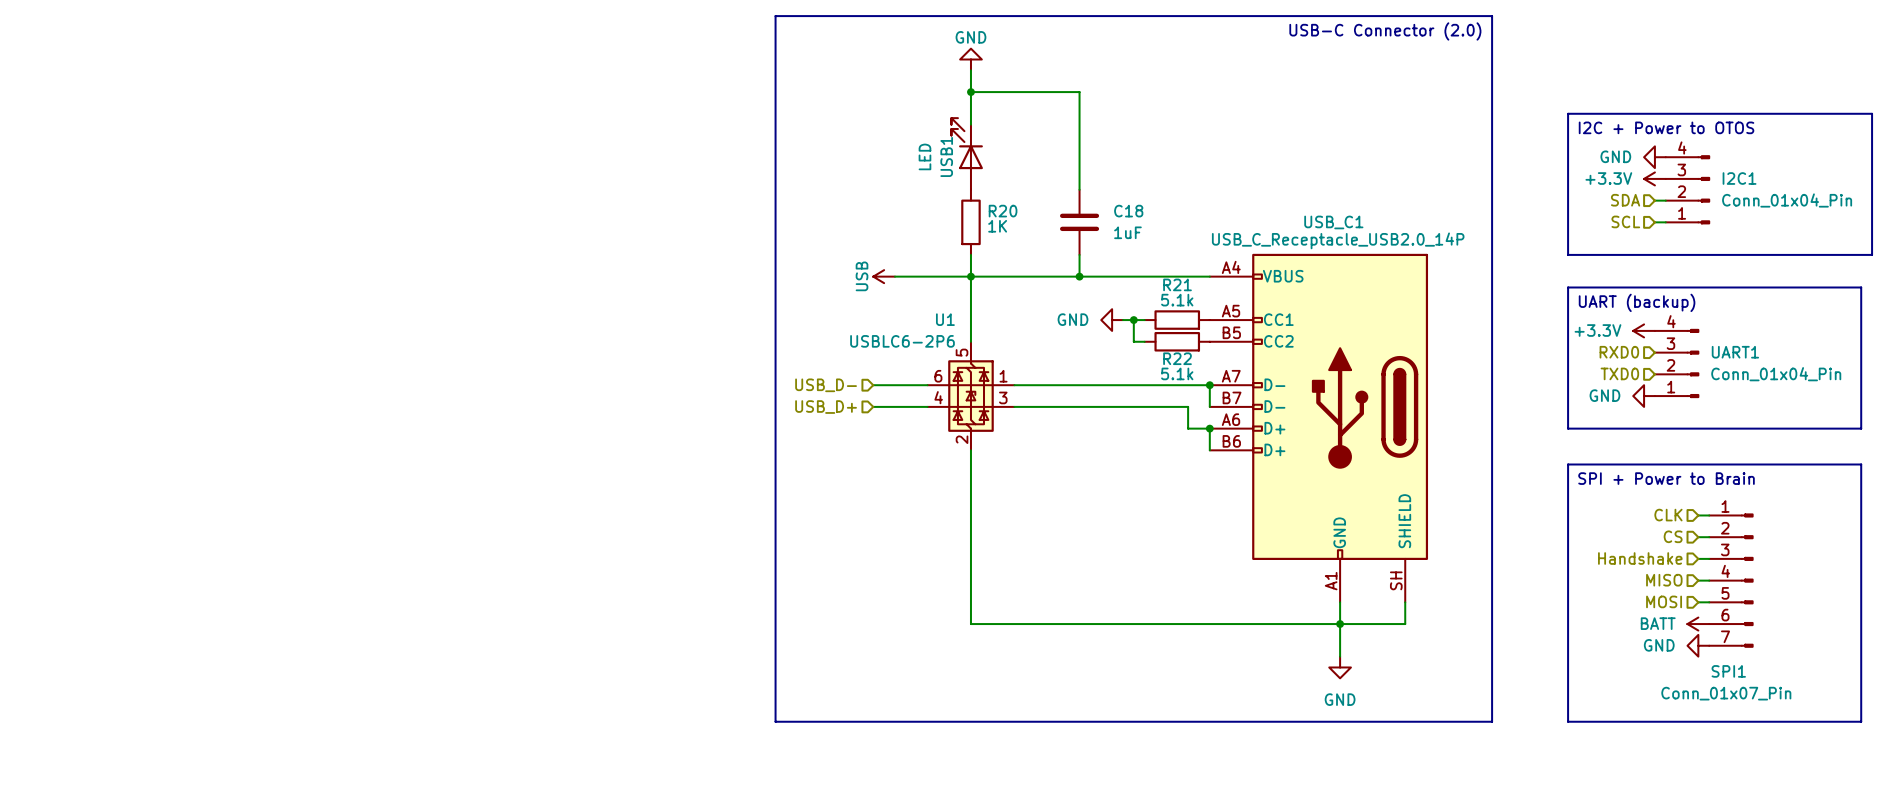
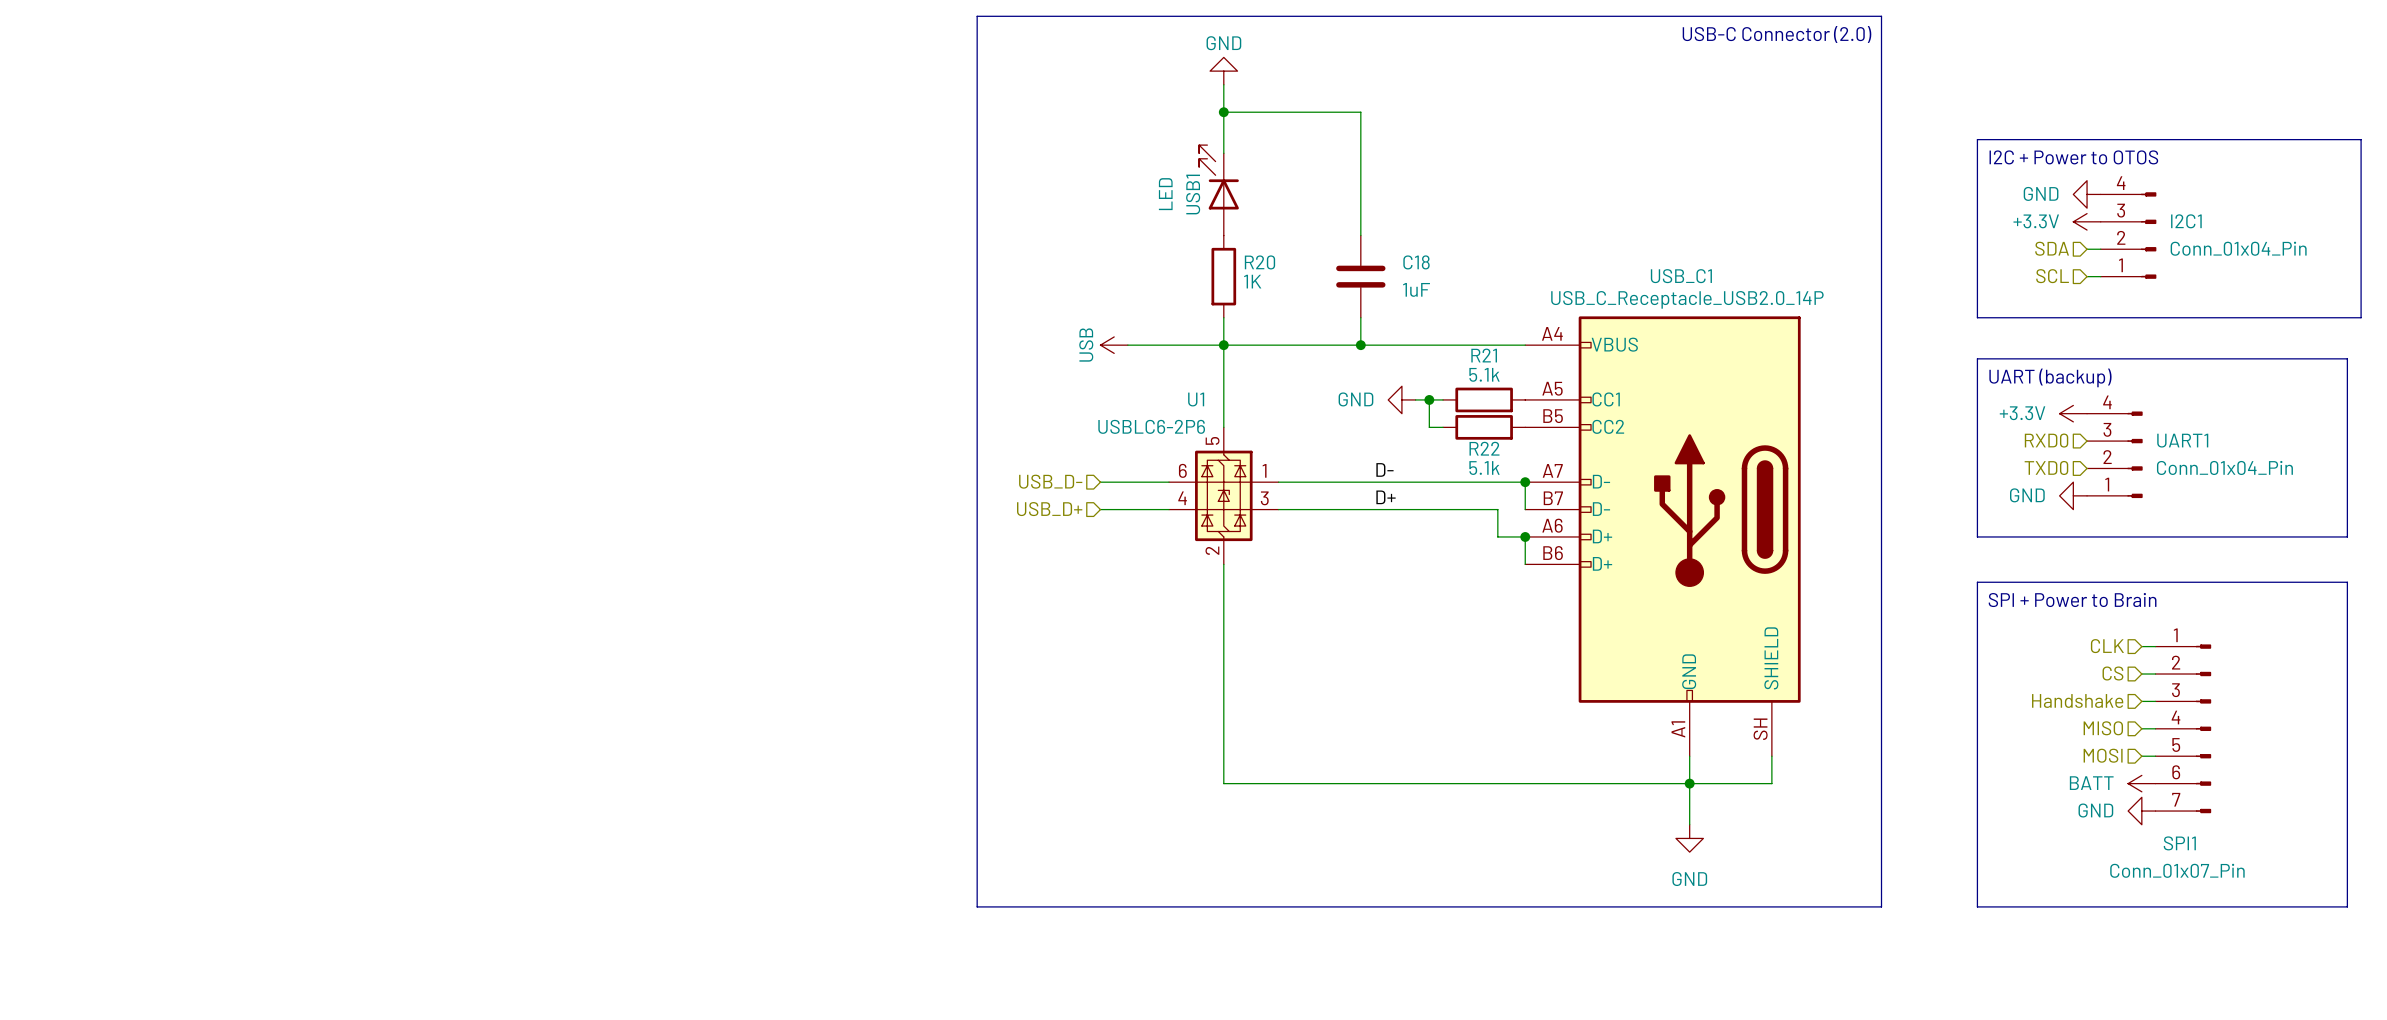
label: none -> D- (1384, 469)
label: none -> D+ (1386, 497)

